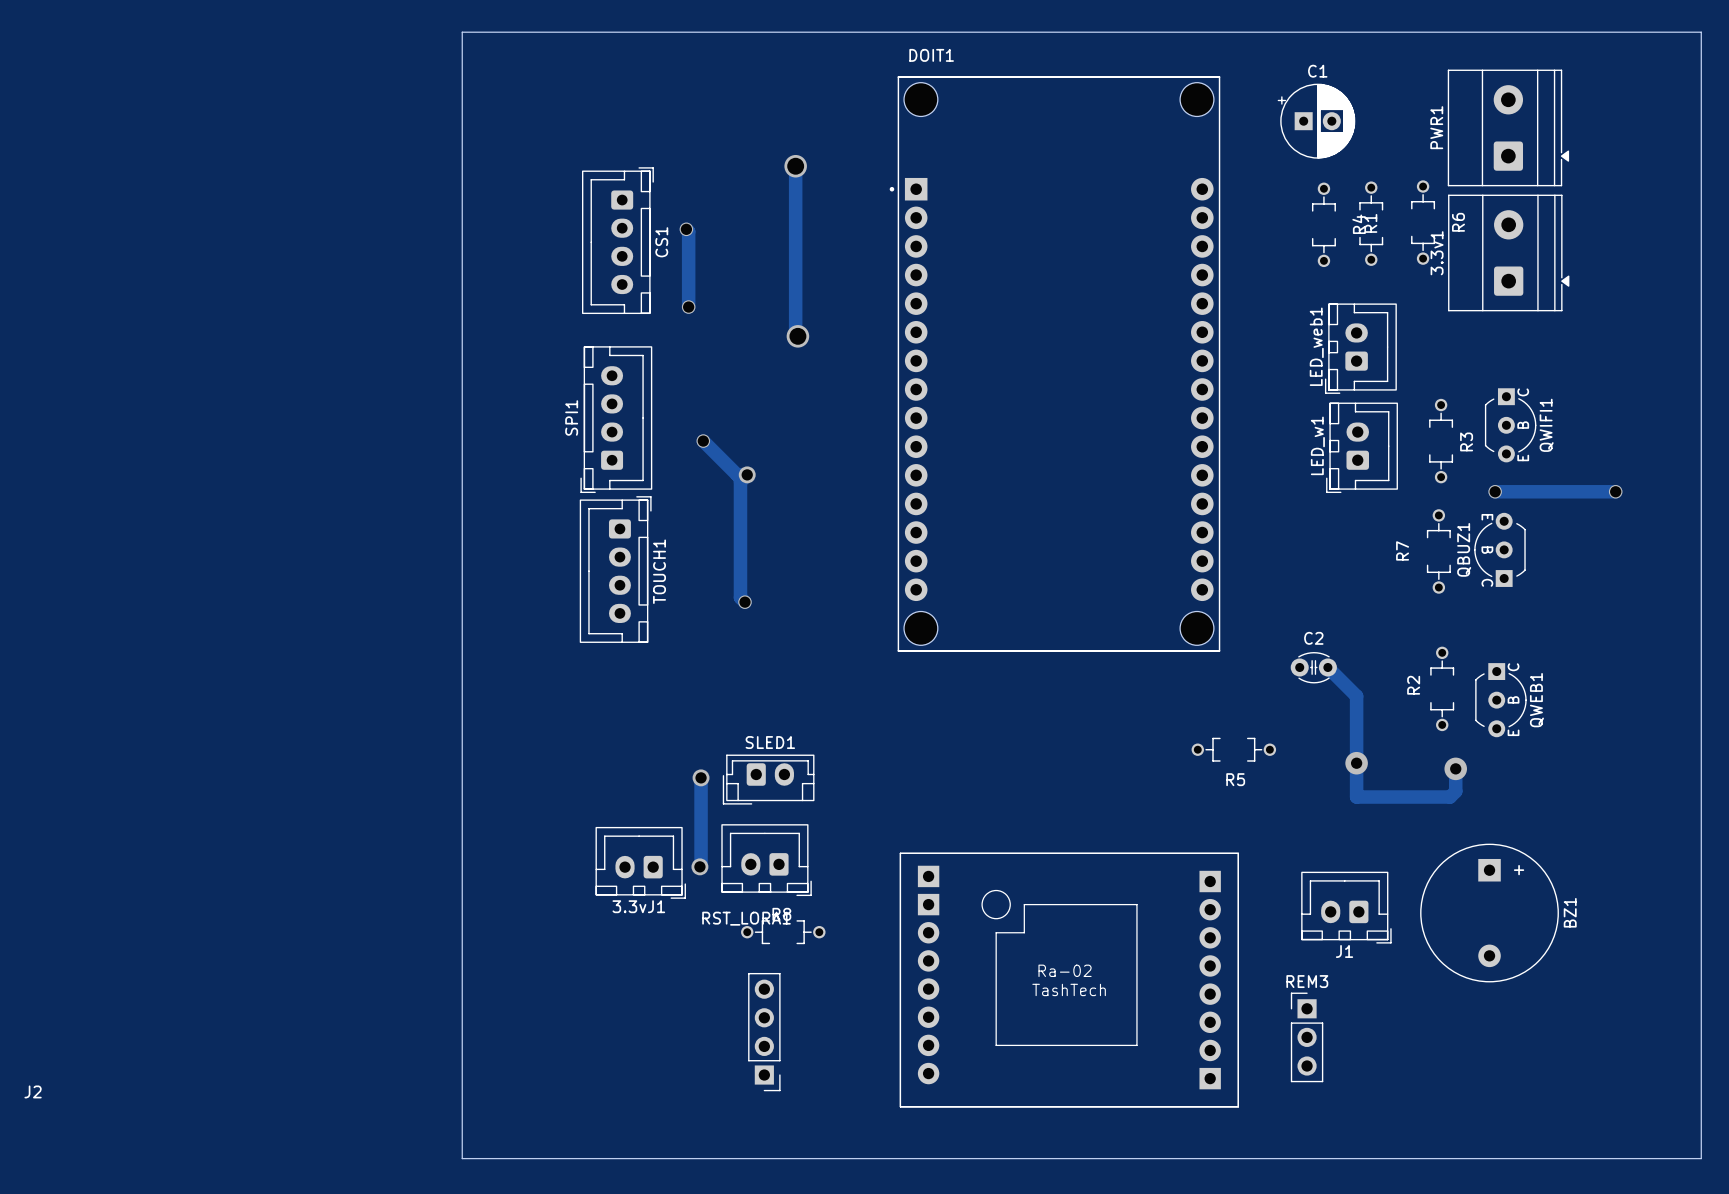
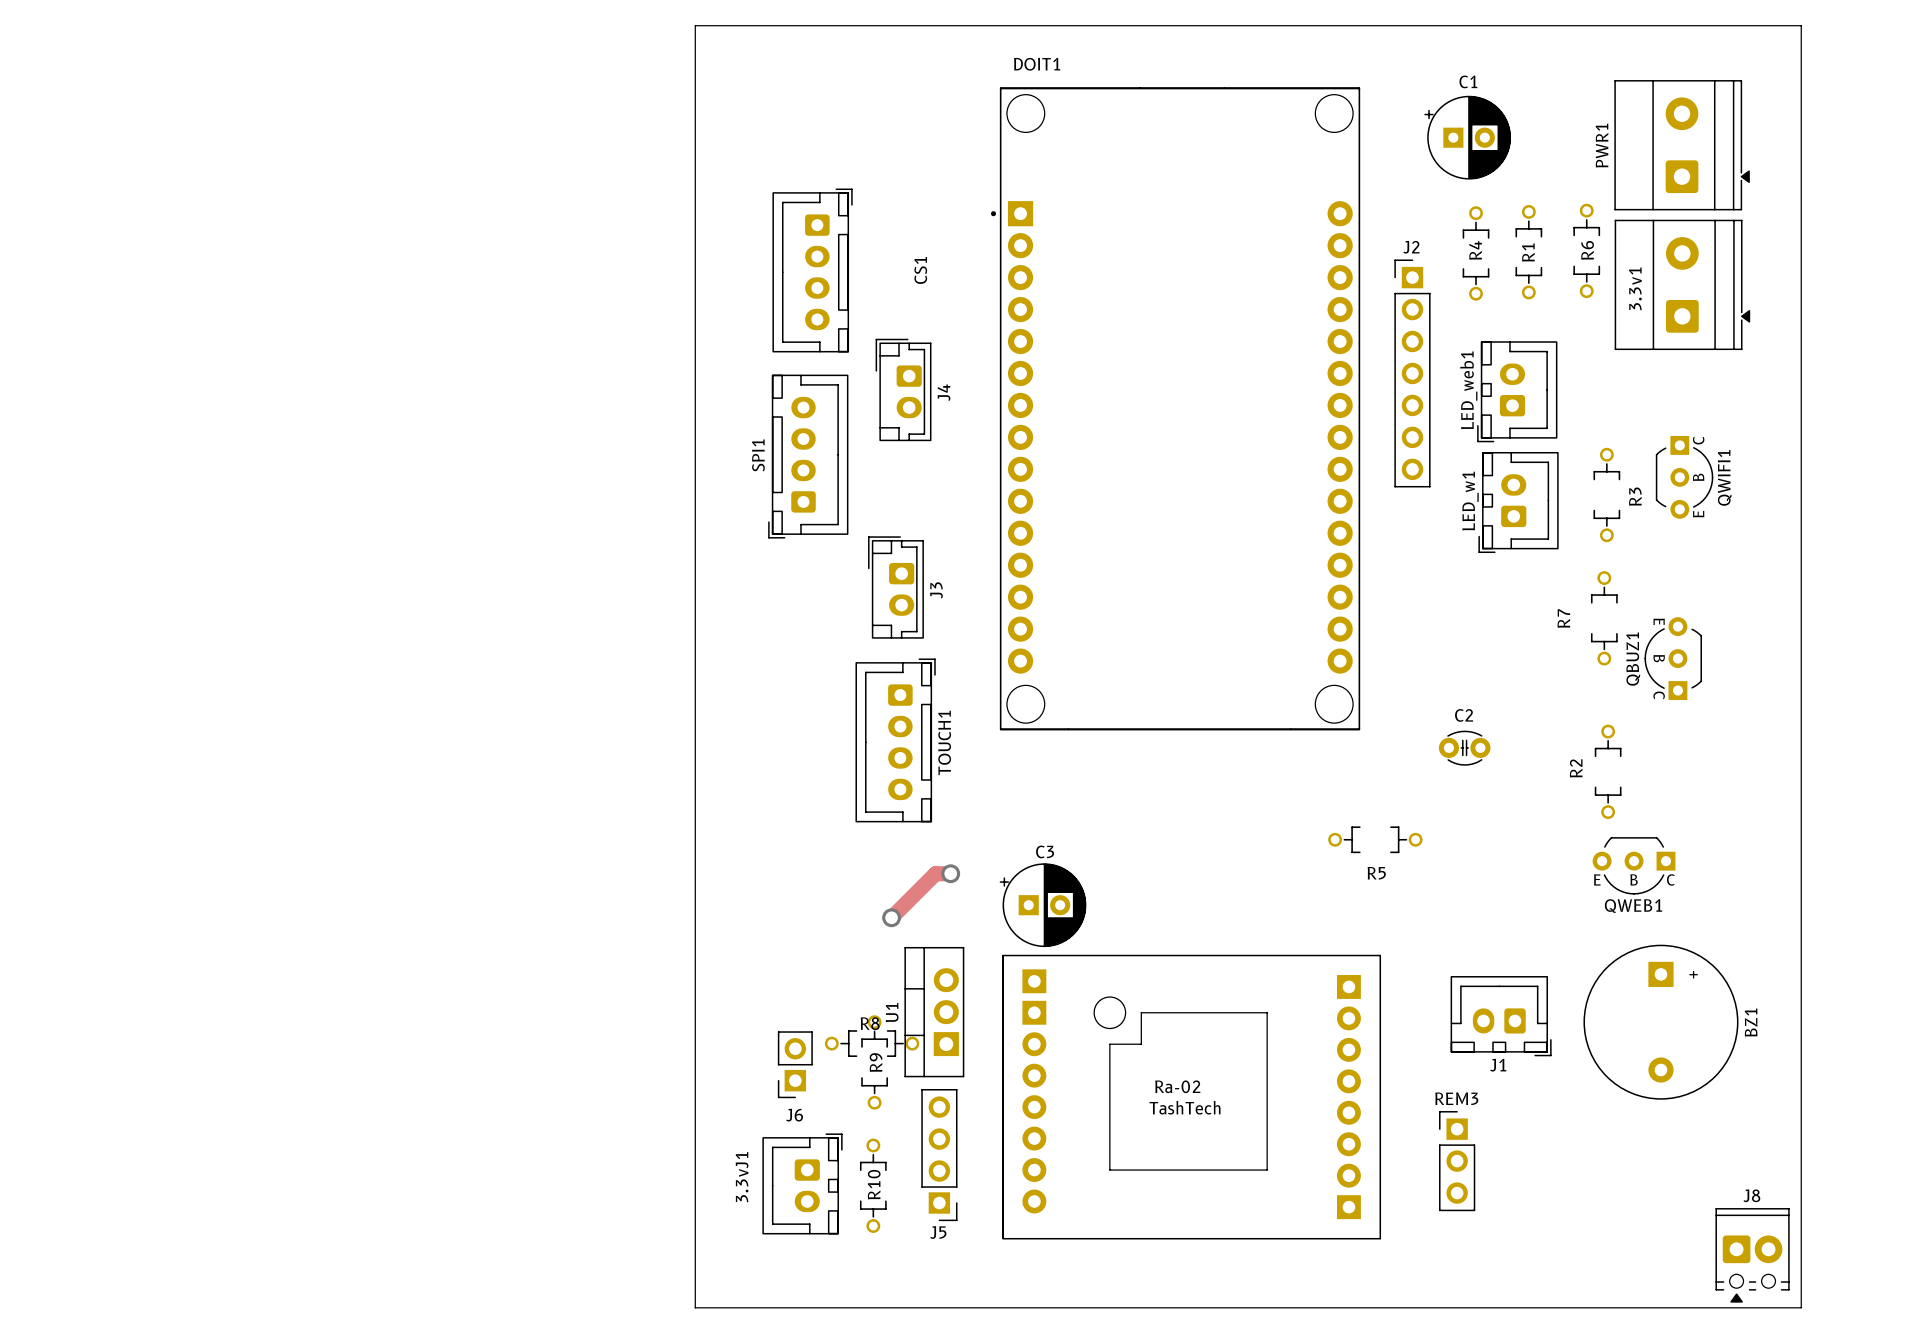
board edge: (462, 32) (1701, 32) (1701, 1158) (462, 1158) (462, 32) -> (695, 25) (695, 1307) (1801, 1307) (1801, 25) (695, 25)
track: (795, 166) (795, 334) (797, 336) -> none
via: (795, 166) -> none
R6 name position: R6 (1458, 222) -> R6 (1587, 250)
R4 name position: R4 (1359, 224) -> R4 (1475, 250)
track: (686, 229) (688, 231) (688, 307) -> none
via: (686, 229) -> none
CS1 position: (617, 240) -> (812, 270)
CS1 name position: CS1 (661, 242) -> CS1 (920, 270)
3.3v1 name position: 3.3v1 (1437, 253) -> 3.3v1 (1635, 288)
via: (688, 307) -> none
via: (797, 336) -> none
J4: none -> (903, 389)
SPI1 position: (616, 419) -> (808, 456)
track: (703, 441) (737, 474) (747, 474) (740, 481) (740, 597) (744, 602) -> none
via: (703, 441) -> none
via: (747, 474) -> none
track: (1495, 491) (1615, 491) -> none
via: (1495, 491) -> none
via: (1615, 491) -> none
J3: none -> (895, 587)
QBUZ1 position: (1499, 549) -> (1673, 658)
TOUCH1 position: (615, 569) -> (895, 740)
via: (744, 602) -> none
track: (1327, 667) (1356, 696) (1356, 797) (1450, 797) (1455, 791) (1455, 768) -> none
QWEB1 rotation: 0° (1500, 700) -> 90° clockwise (1634, 865)
QWEB1 position: (1500, 700) -> (1634, 865)
via: (1356, 763) -> none
via: (1455, 768) -> none
track: (701, 777) (699, 866) -> none
via: (701, 777) -> none
SLED1: (768, 779) -> none
track: none -> (950, 873) (935, 873) (891, 917)
via: none -> (950, 873)
C3: none -> (1043, 905)
via: none -> (891, 917)
RST_LORA1: (766, 860) -> none
3.3vJ1 rotation: 0° (640, 862) -> 90° counterclockwise (802, 1183)
3.3vJ1 position: (640, 862) -> (802, 1183)
via: (699, 866) -> none
U1: none -> (934, 1012)
3.3vJ1 name position: 3.3vJ1 (638, 906) -> 3.3vJ1 (742, 1177)
R9: none -> (874, 1062)
J6: none -> (795, 1064)
J2 footprint: [748, 972, 781, 1092] -> [1394, 259, 1431, 488]
J5: none -> (939, 1155)
R10: none -> (873, 1185)
J2 name position: J2 (33, 1091) -> J2 (1411, 247)
J8: none -> (1752, 1255)

